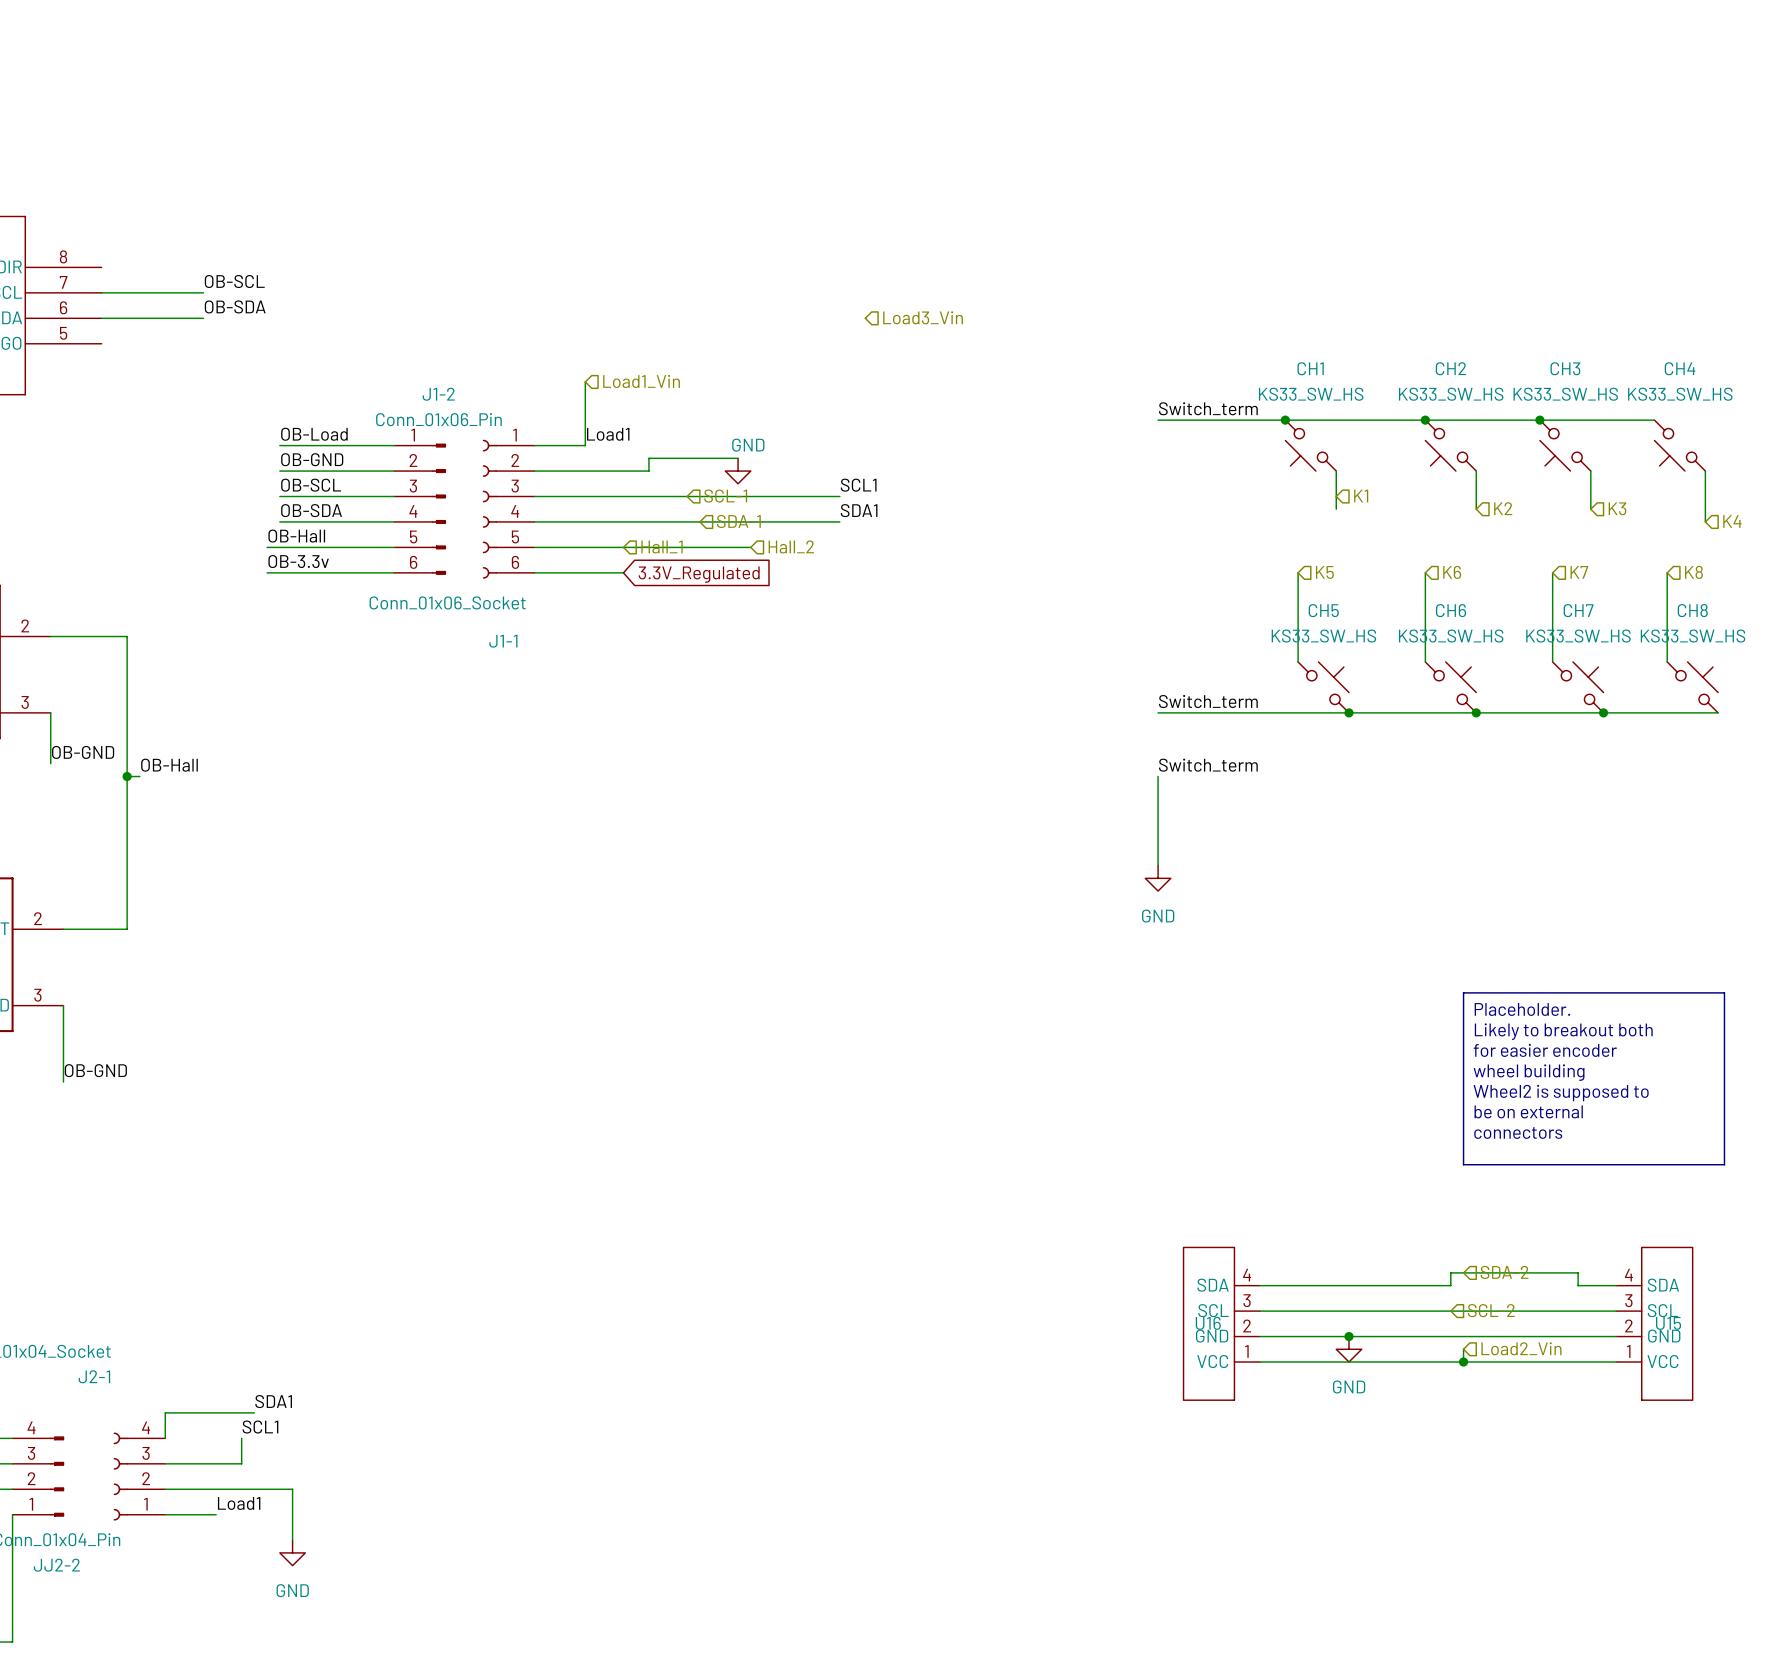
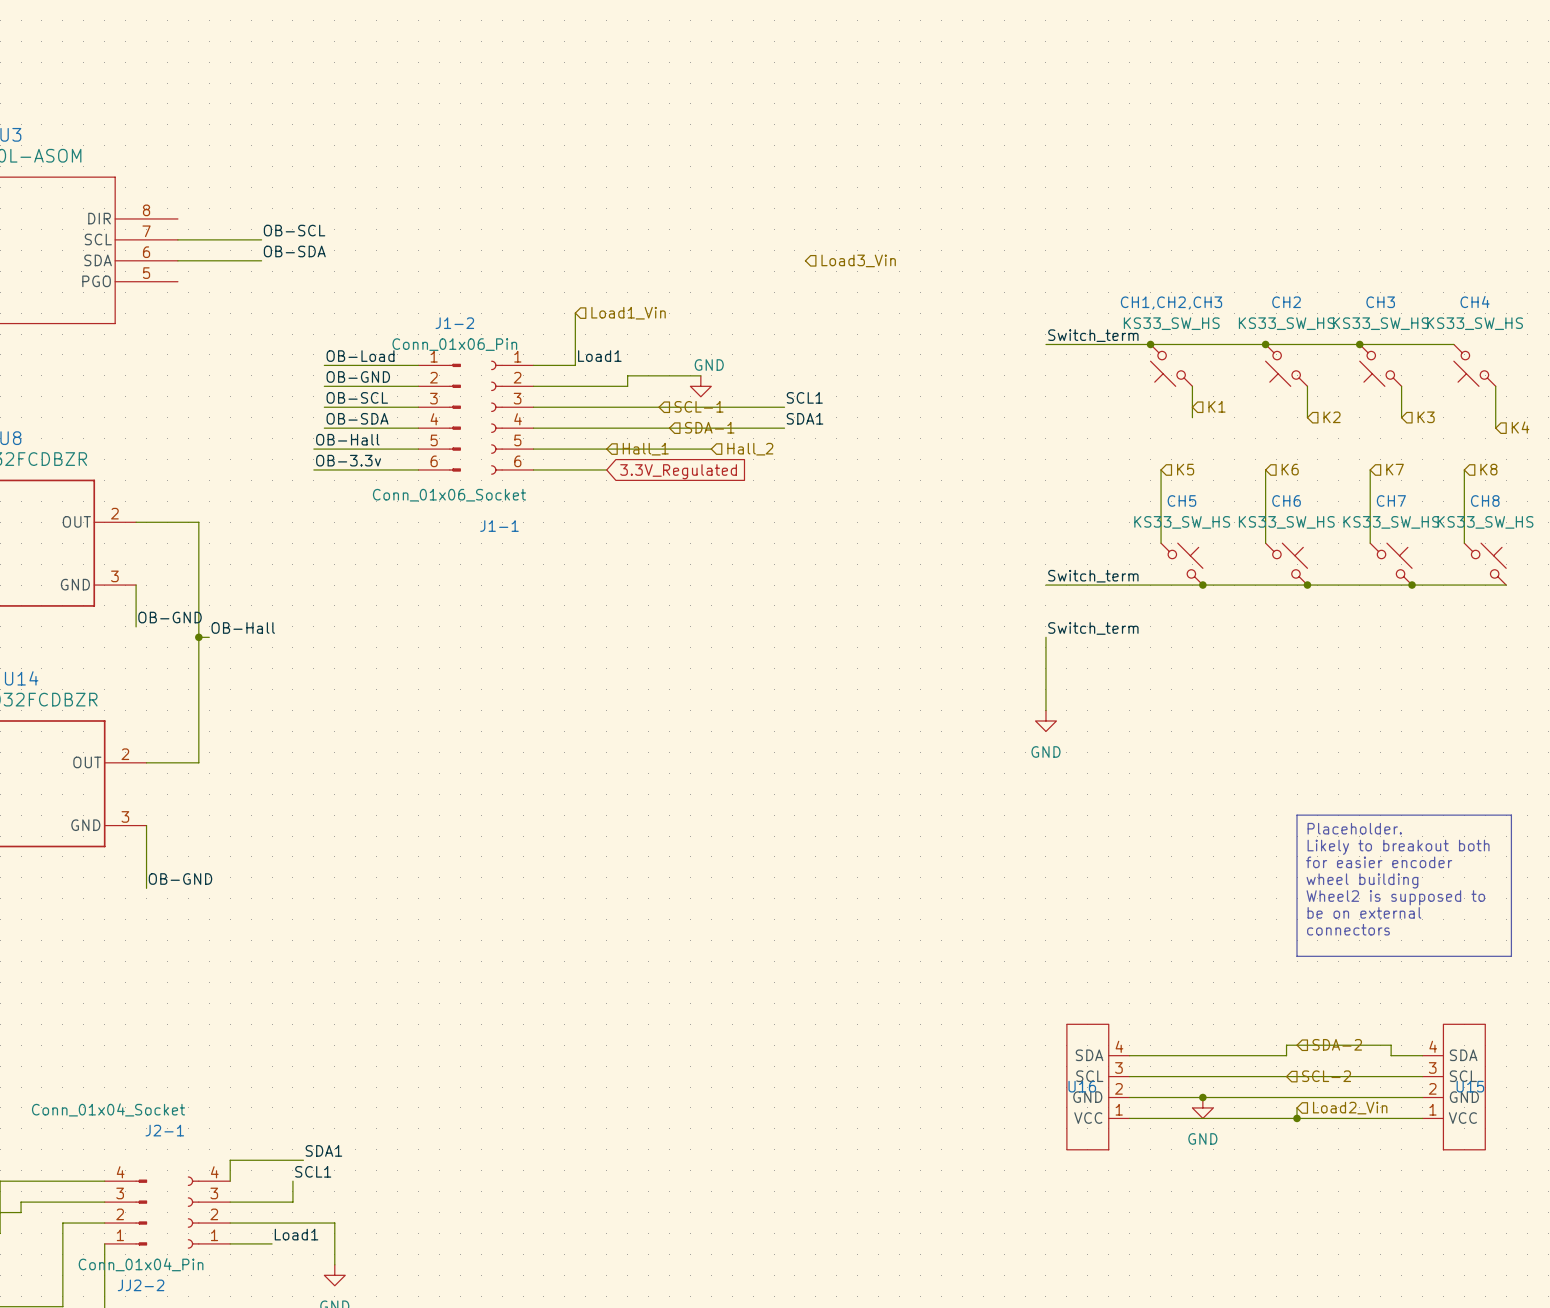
CH1 name: CH1 (1310, 368) -> CH1,CH2,CH3 (1171, 303)

